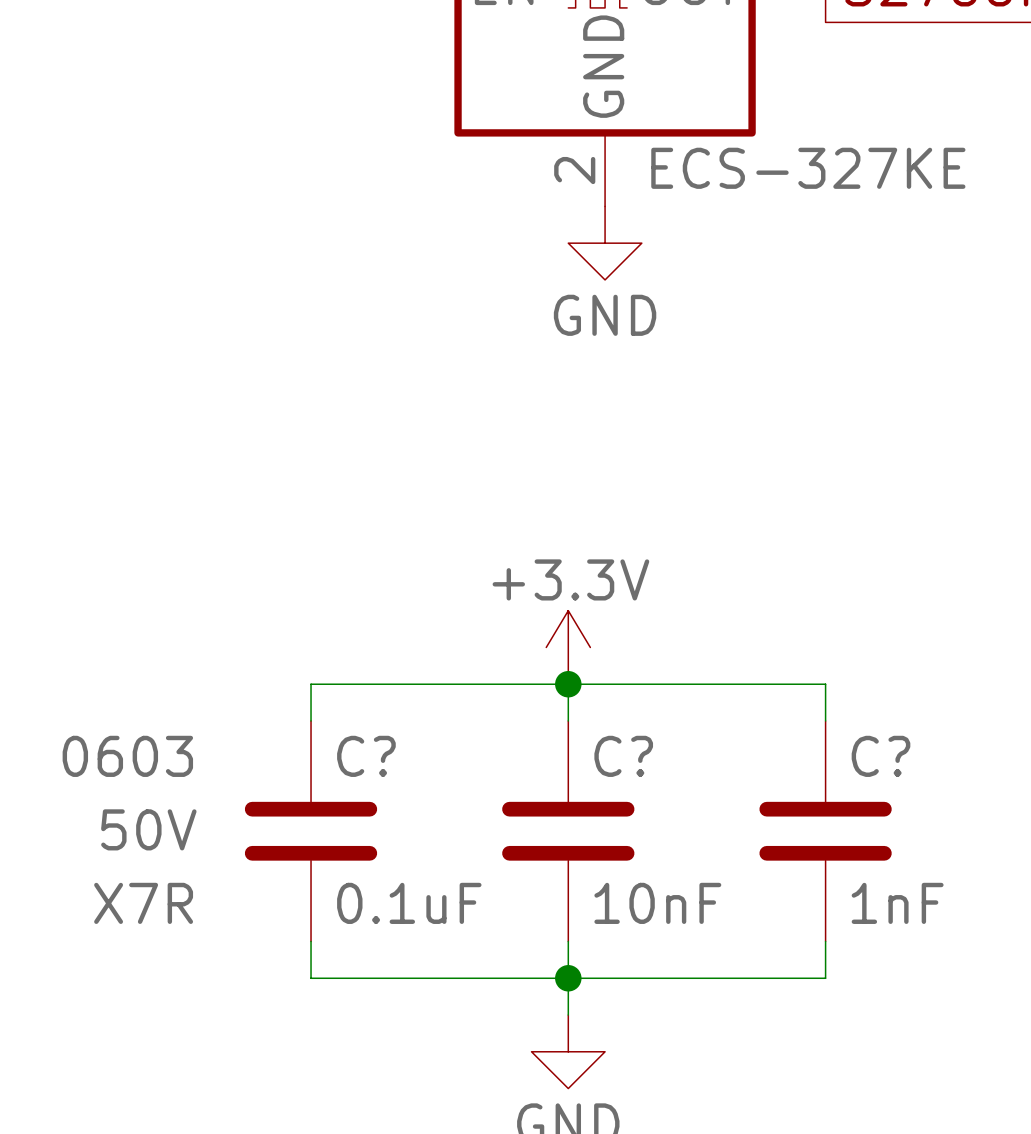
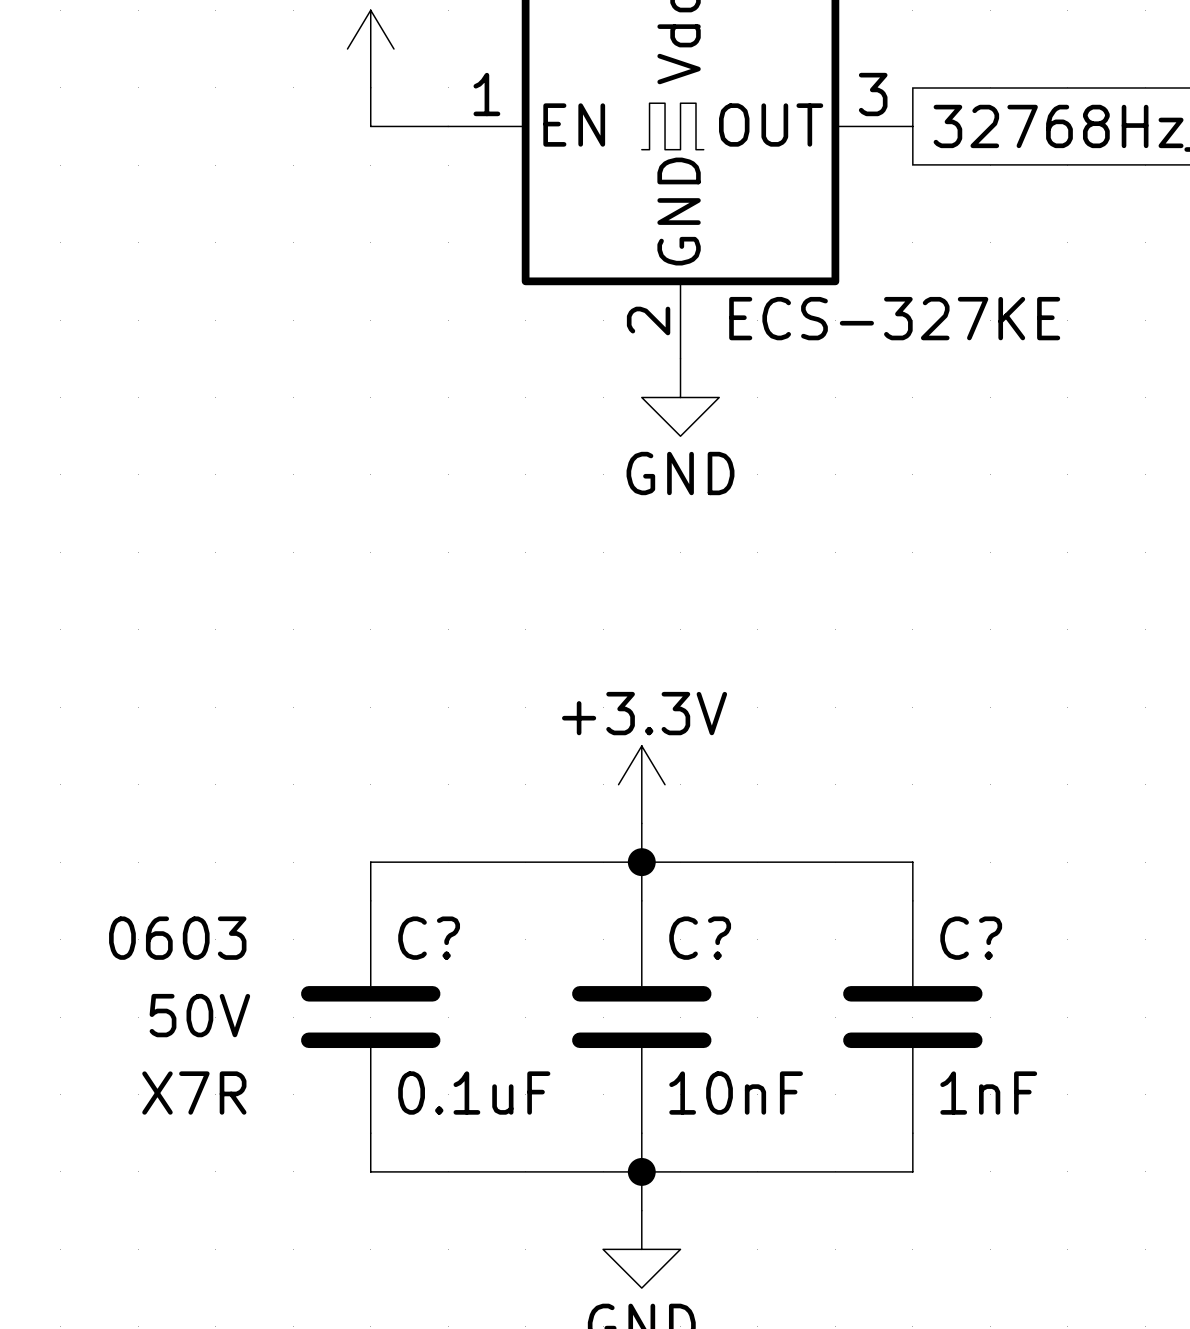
power symbol position: +3.3V (568, 647) -> +3.3V (641, 784)

